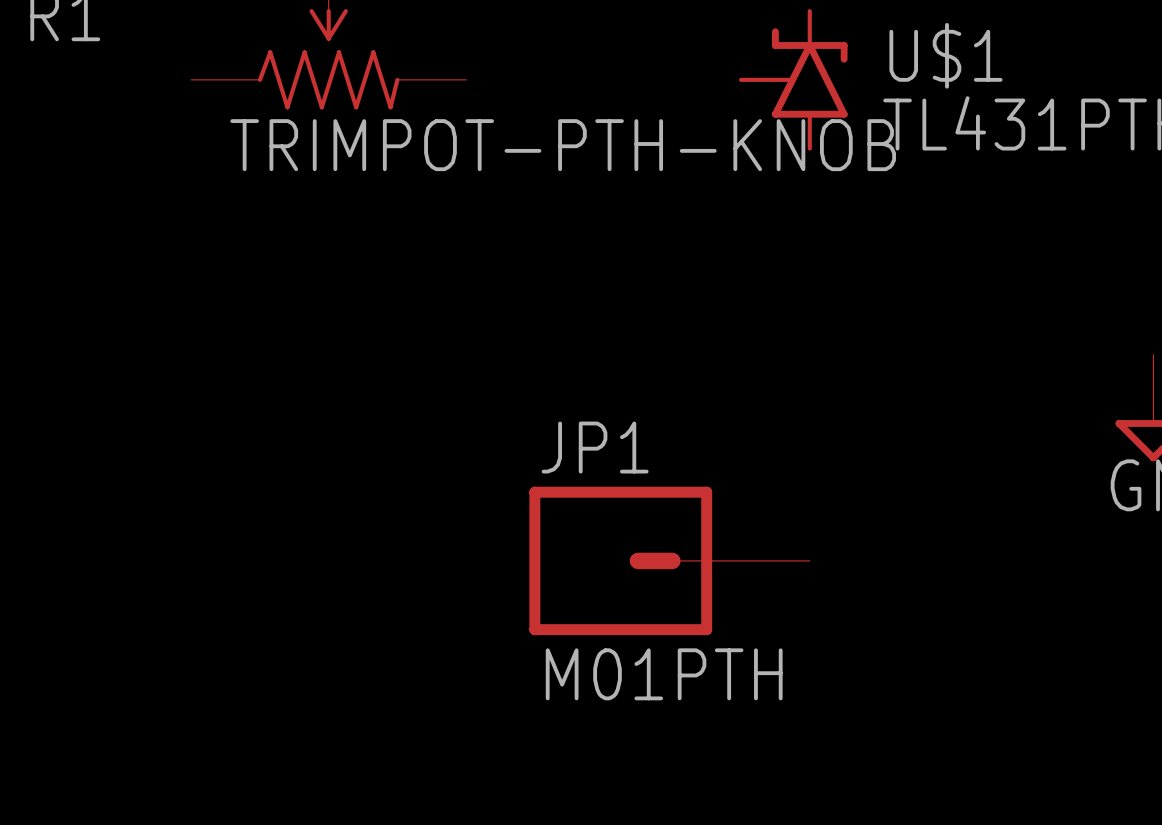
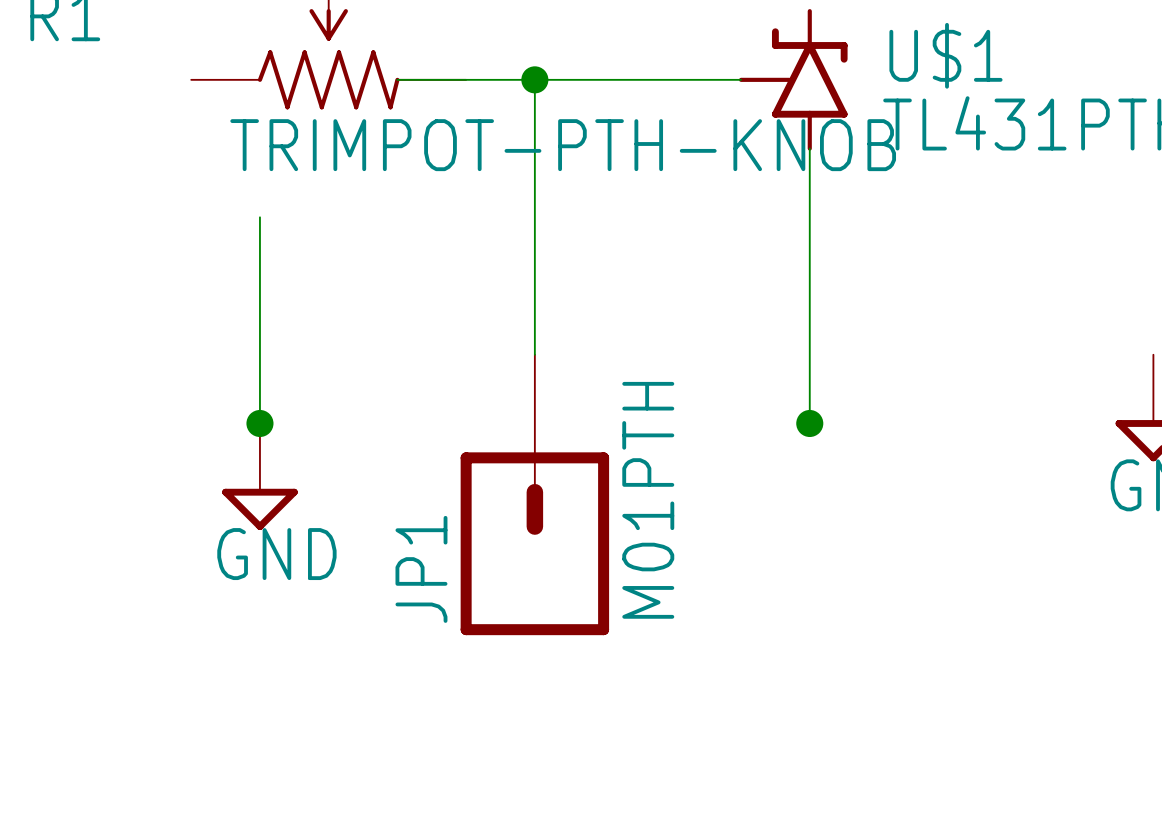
wire: none -> (397, 79) (741, 79)
wire: none -> (534, 79) (534, 354)
junction: none -> (534, 79)
wire: none -> (809, 148) (809, 423)
wire: none -> (259, 217) (259, 423)
junction: none -> (259, 423)
junction: none -> (809, 423)
power symbol: none -> GND (259, 476)
JP1 rotation: 0° (620, 560) -> 90° counterclockwise (534, 543)

